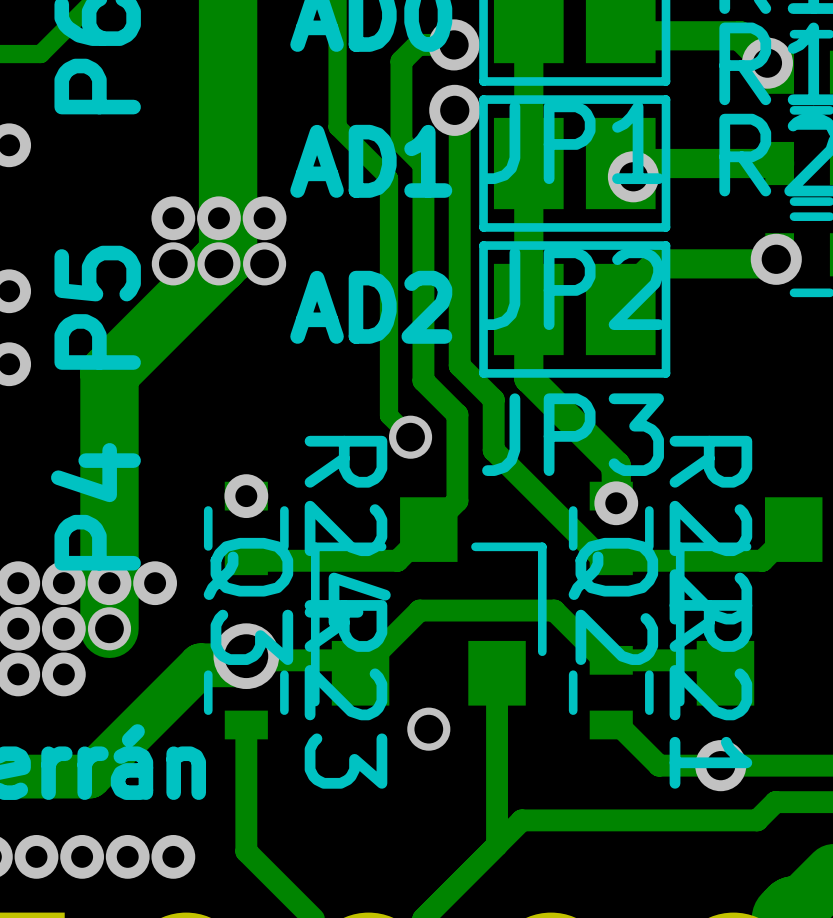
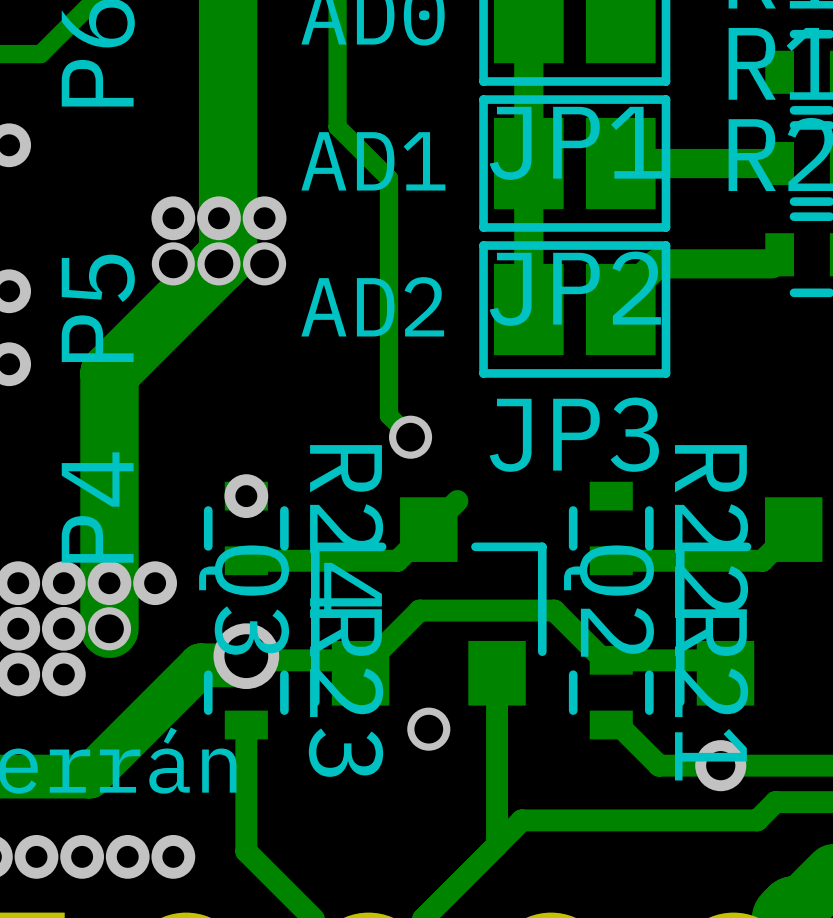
track: (638, 35) (740, 35) (767, 63) -> none
track: (454, 44) (417, 44) (401, 61) (401, 142) (423, 164) (423, 380) (457, 414) (457, 500) -> none
via: (454, 44) -> none
via: (767, 63) -> none
track: (454, 110) (459, 115) (459, 365) (493, 399) (493, 450) (604, 560) -> none
via: (454, 110) -> none
via: (633, 176) -> none
via: (776, 259) -> none
track: (528, 309) (528, 378) (616, 465) (616, 503) -> none
via: (616, 503) -> none

